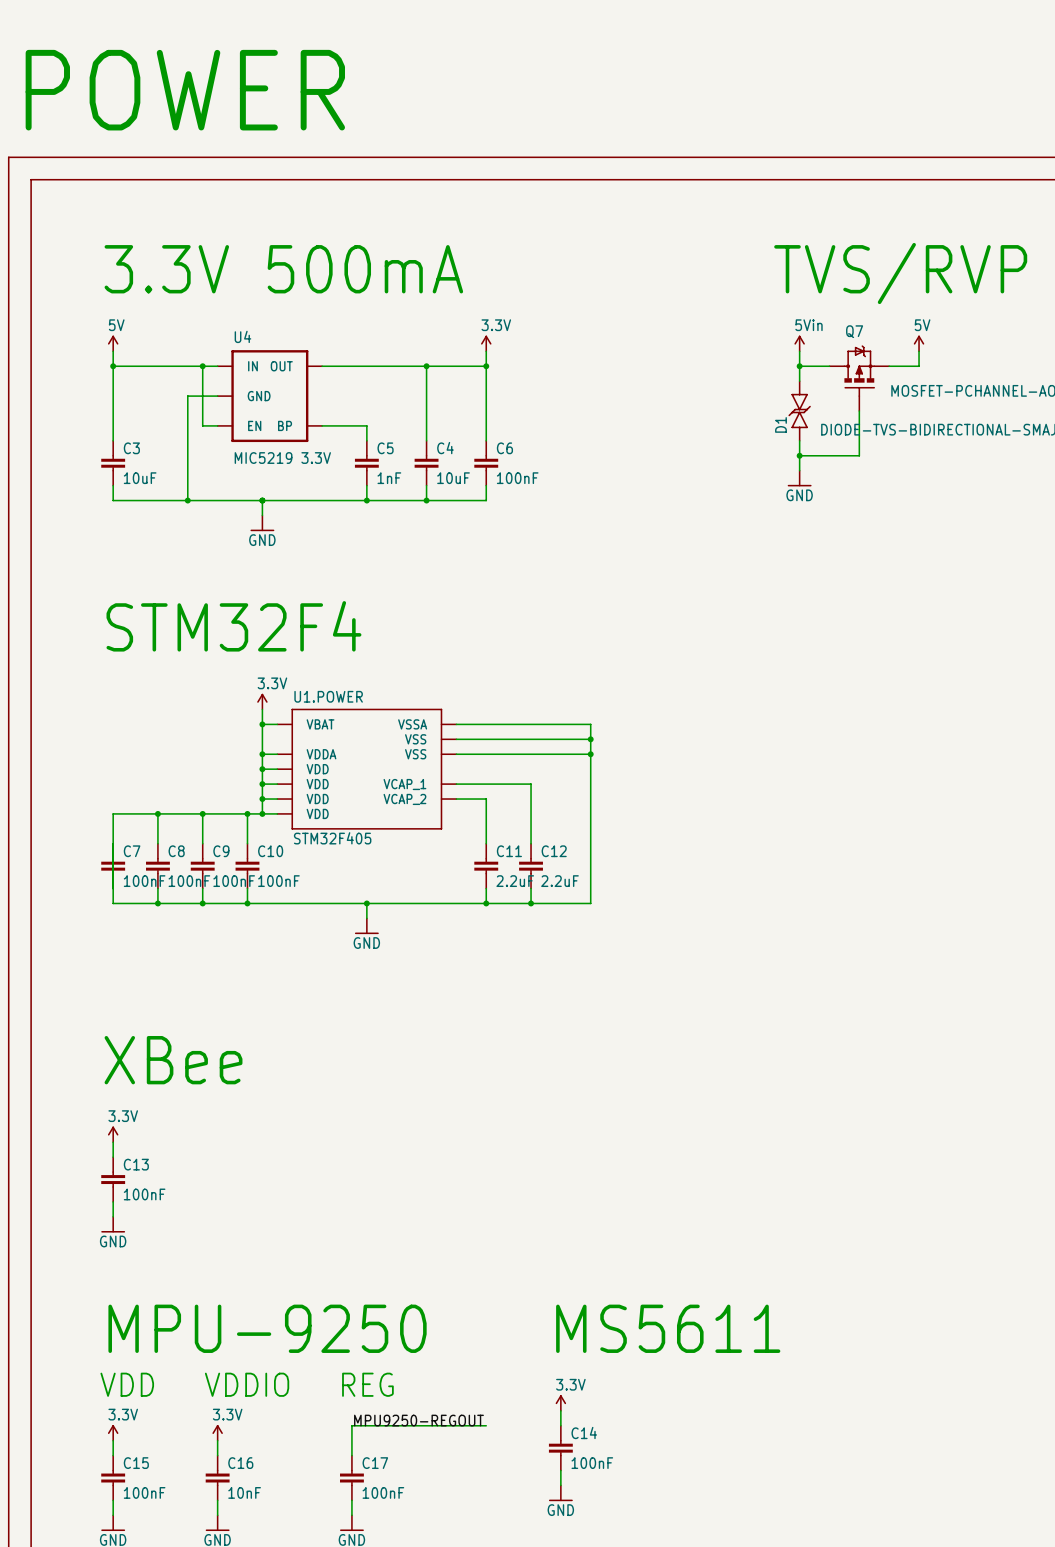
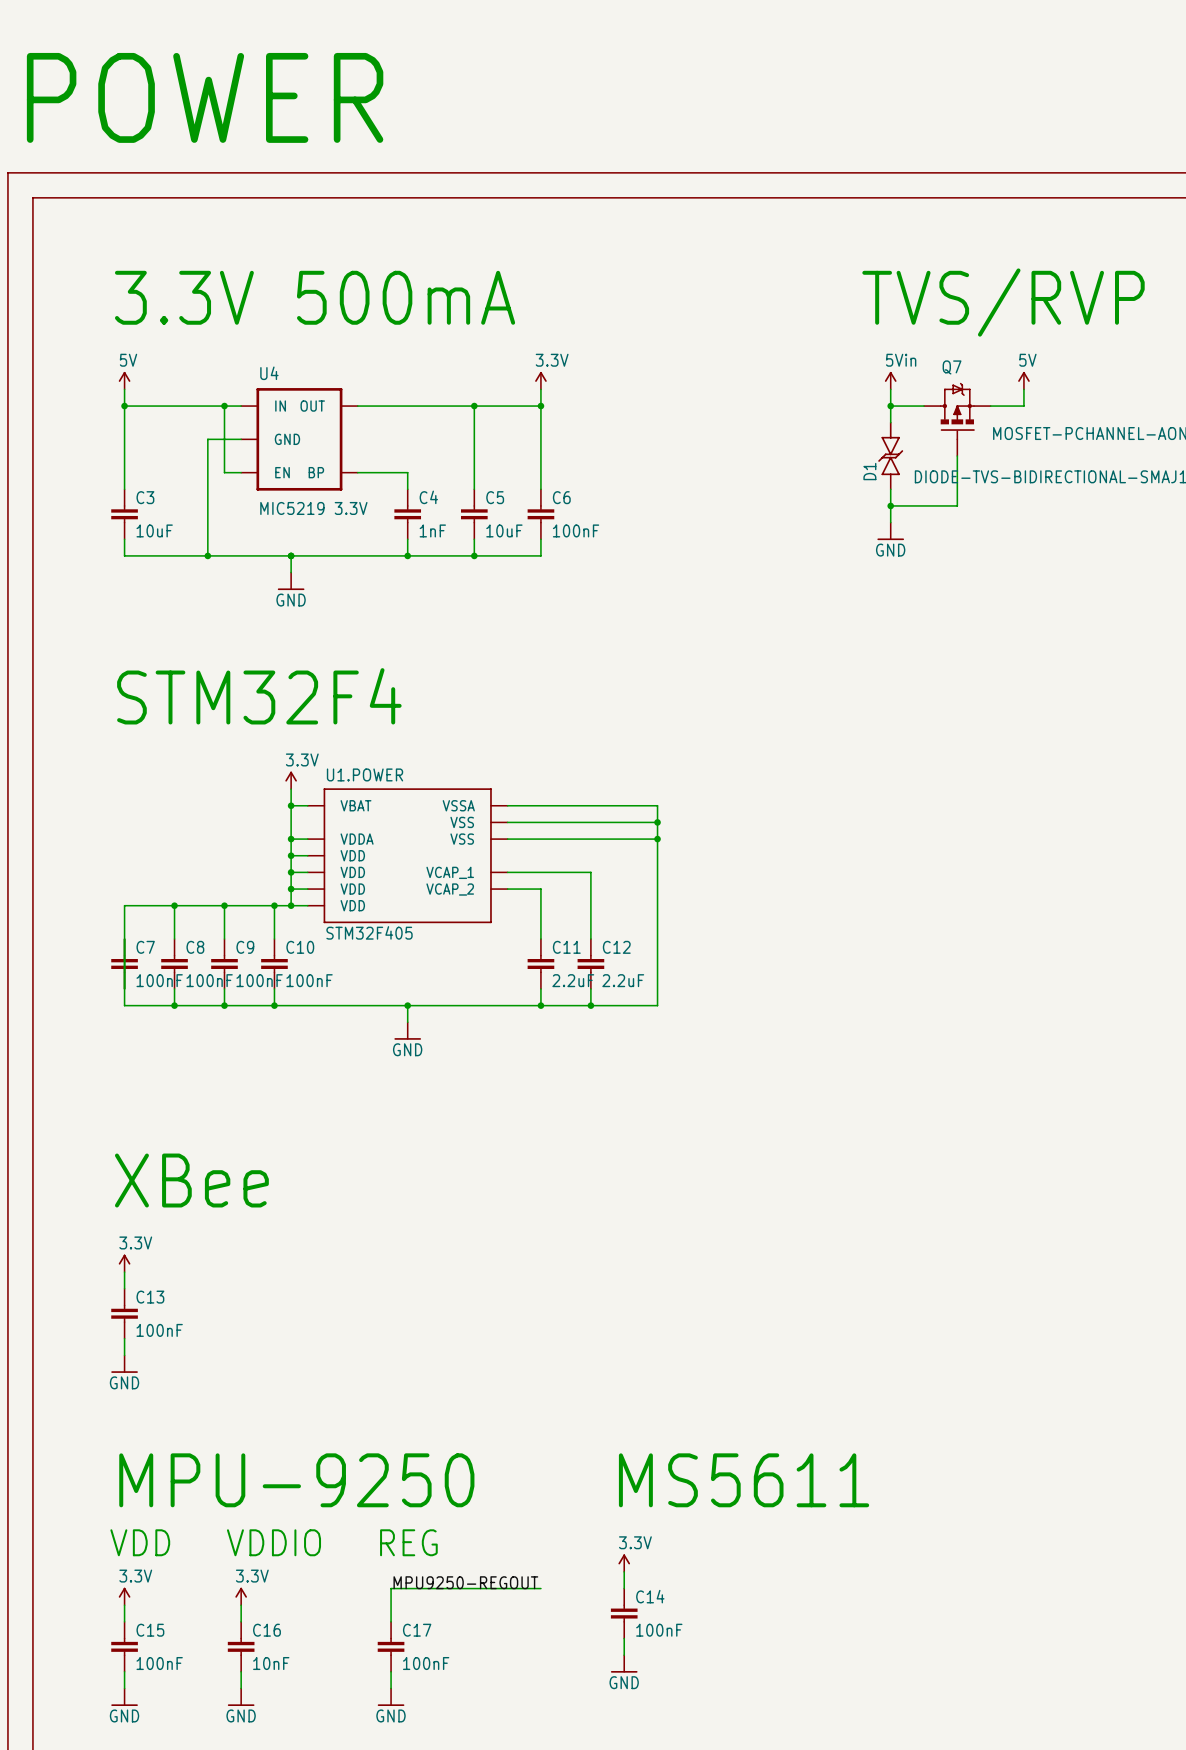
C5 name: C5 (385, 448) -> C4 (428, 497)
C4 name: C4 (445, 448) -> C5 (495, 497)

